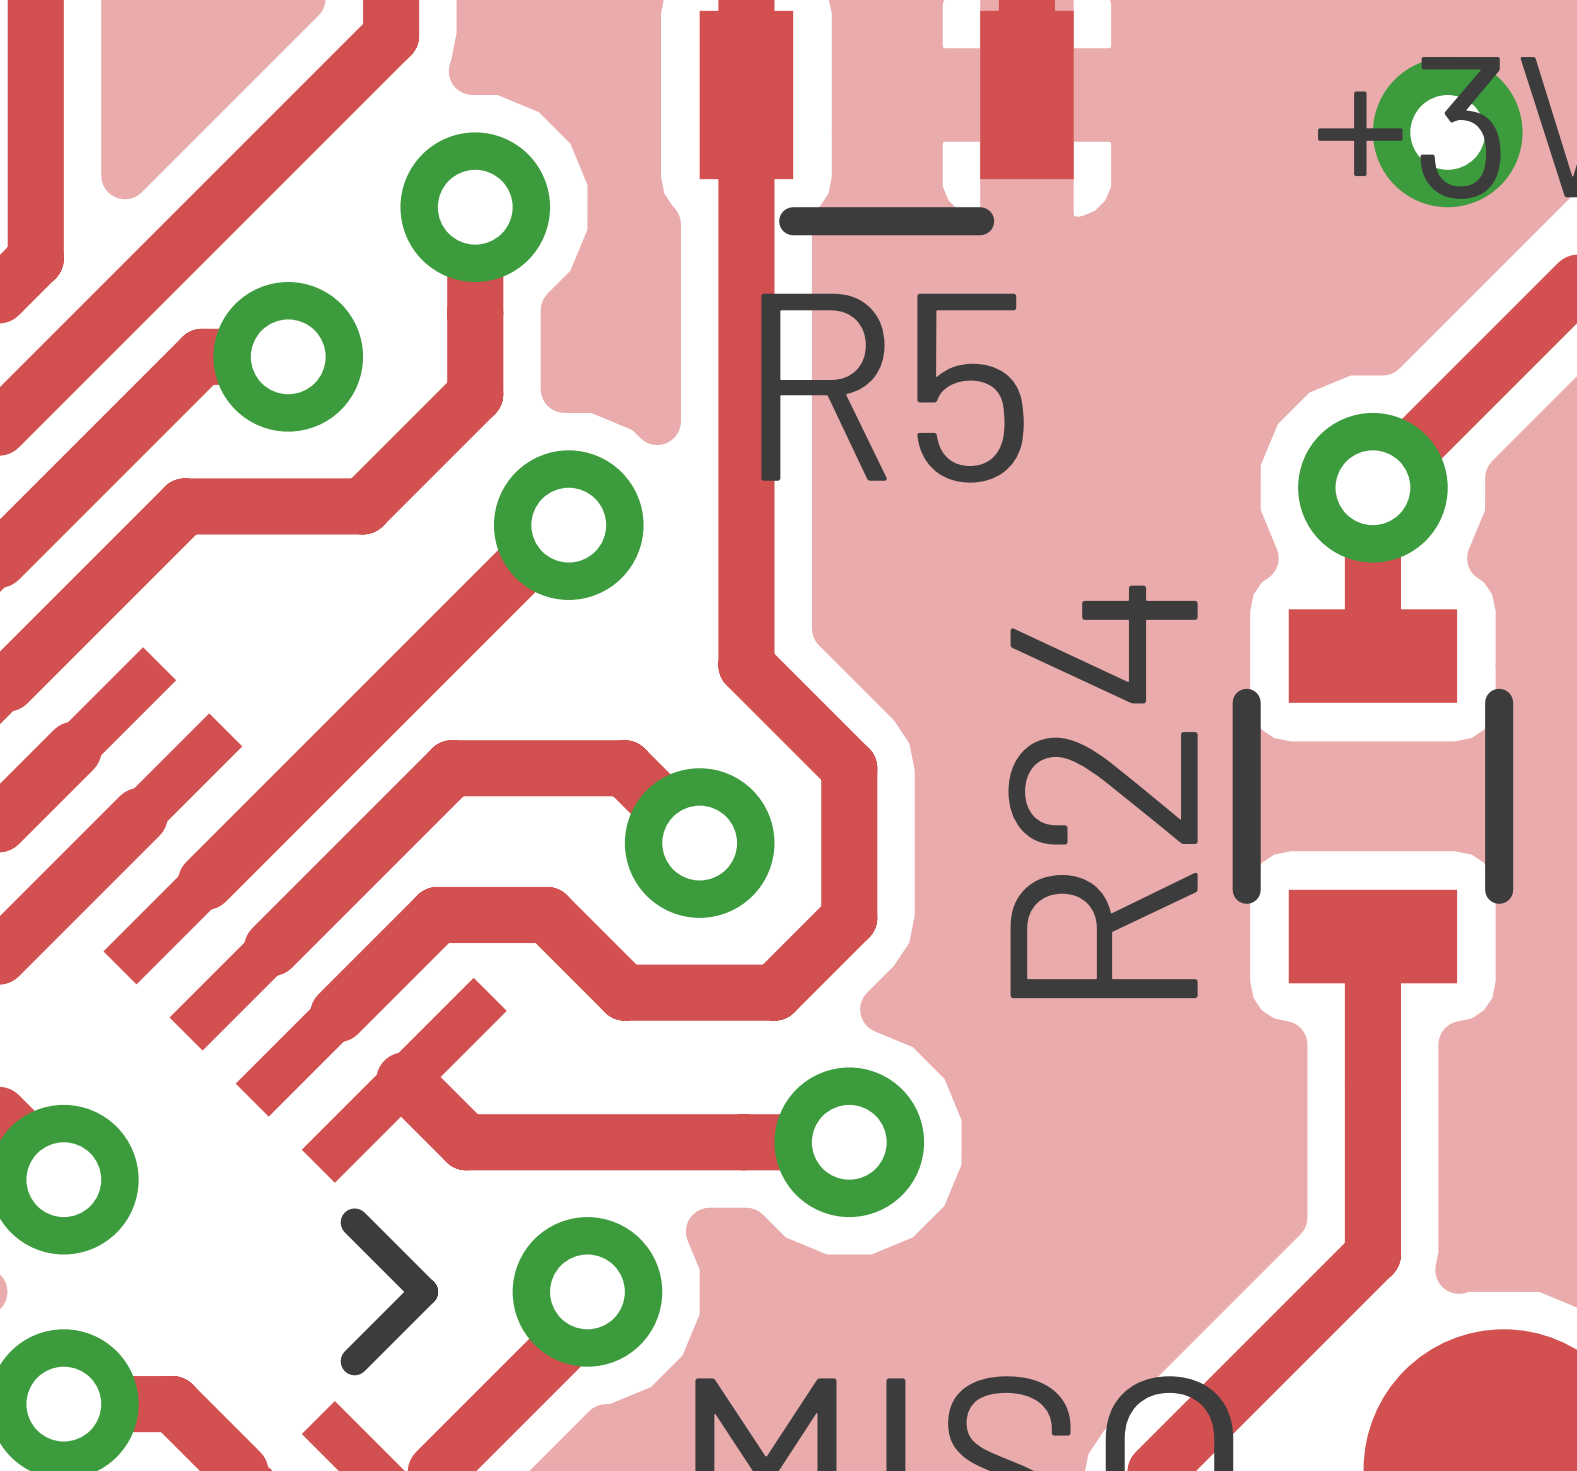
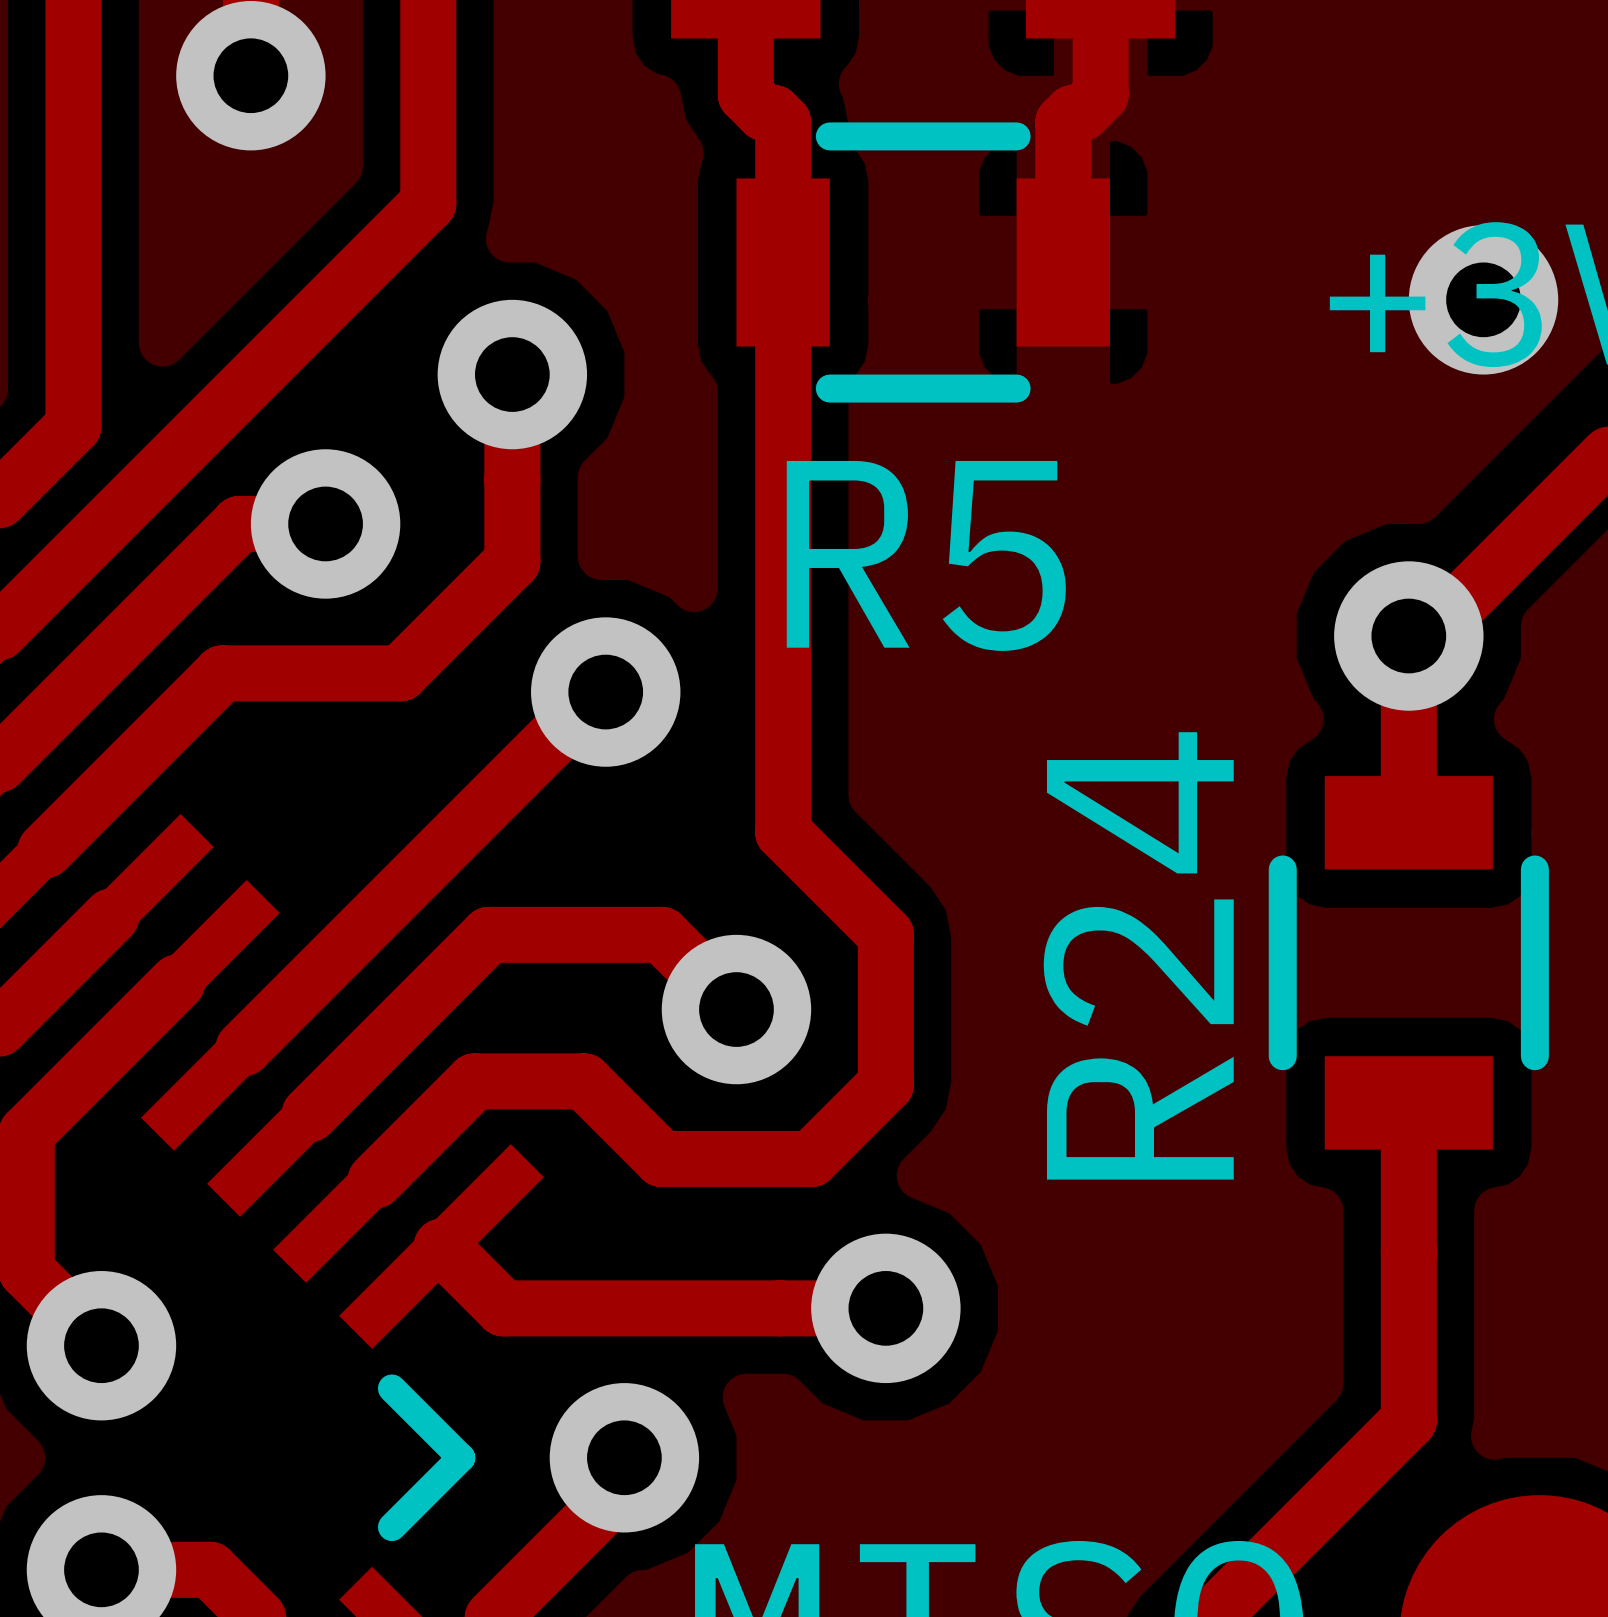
via position: (1372, 487) -> (1408, 636)

